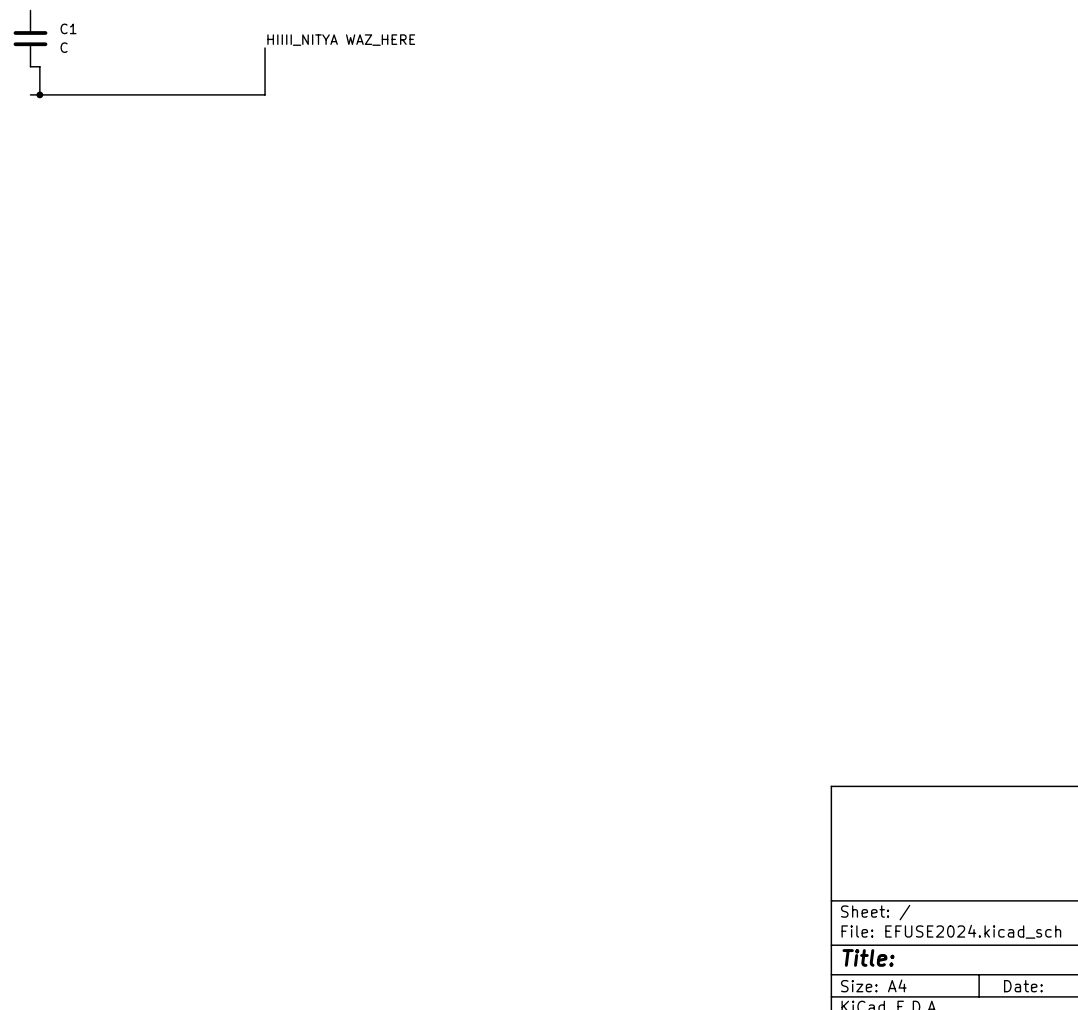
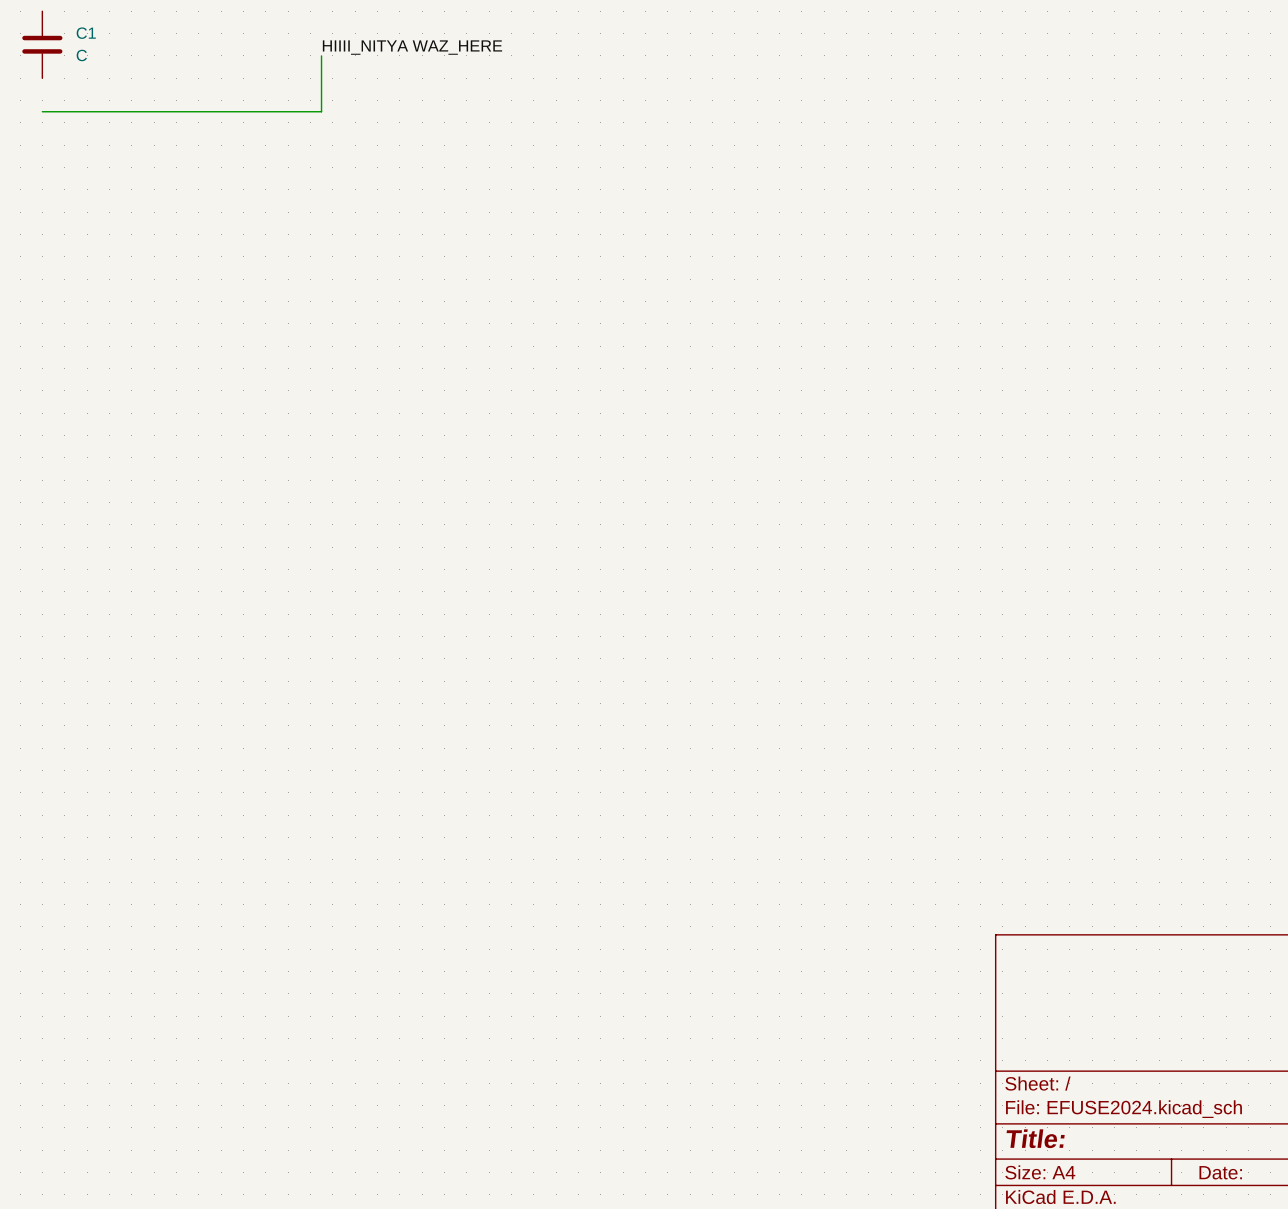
wire: (30, 66) (39, 66) (39, 94) -> none
junction: (39, 94) -> none

